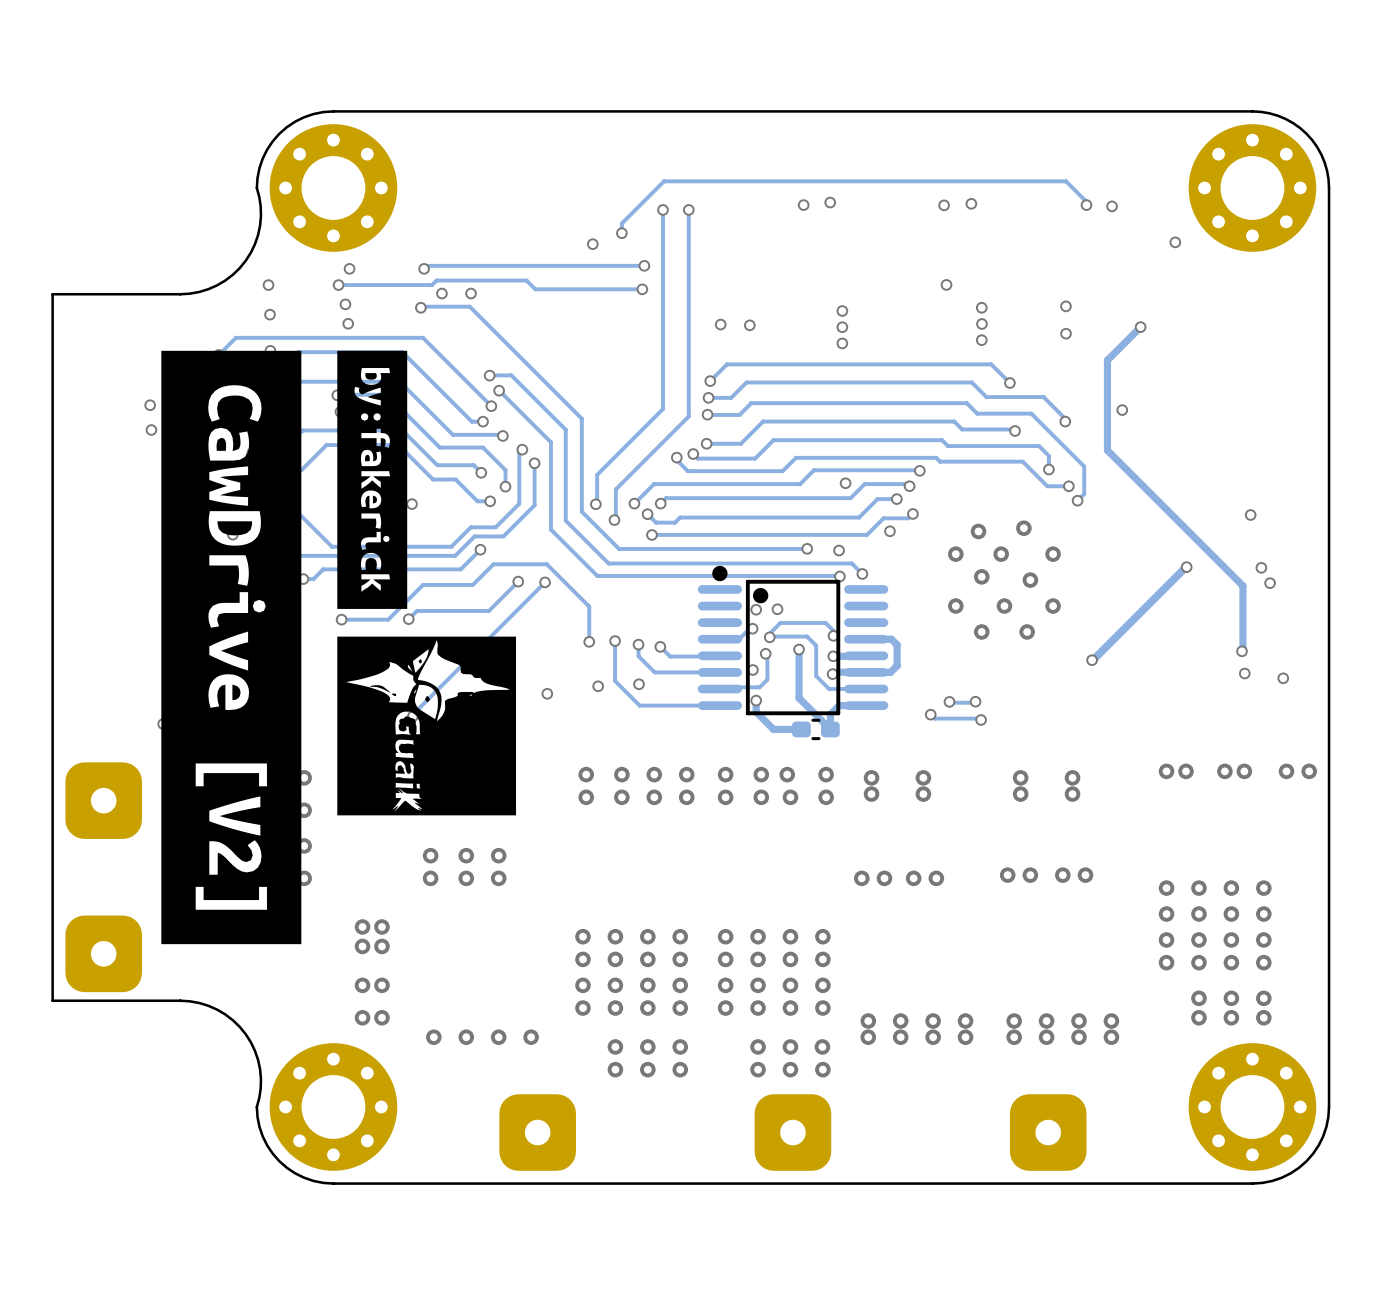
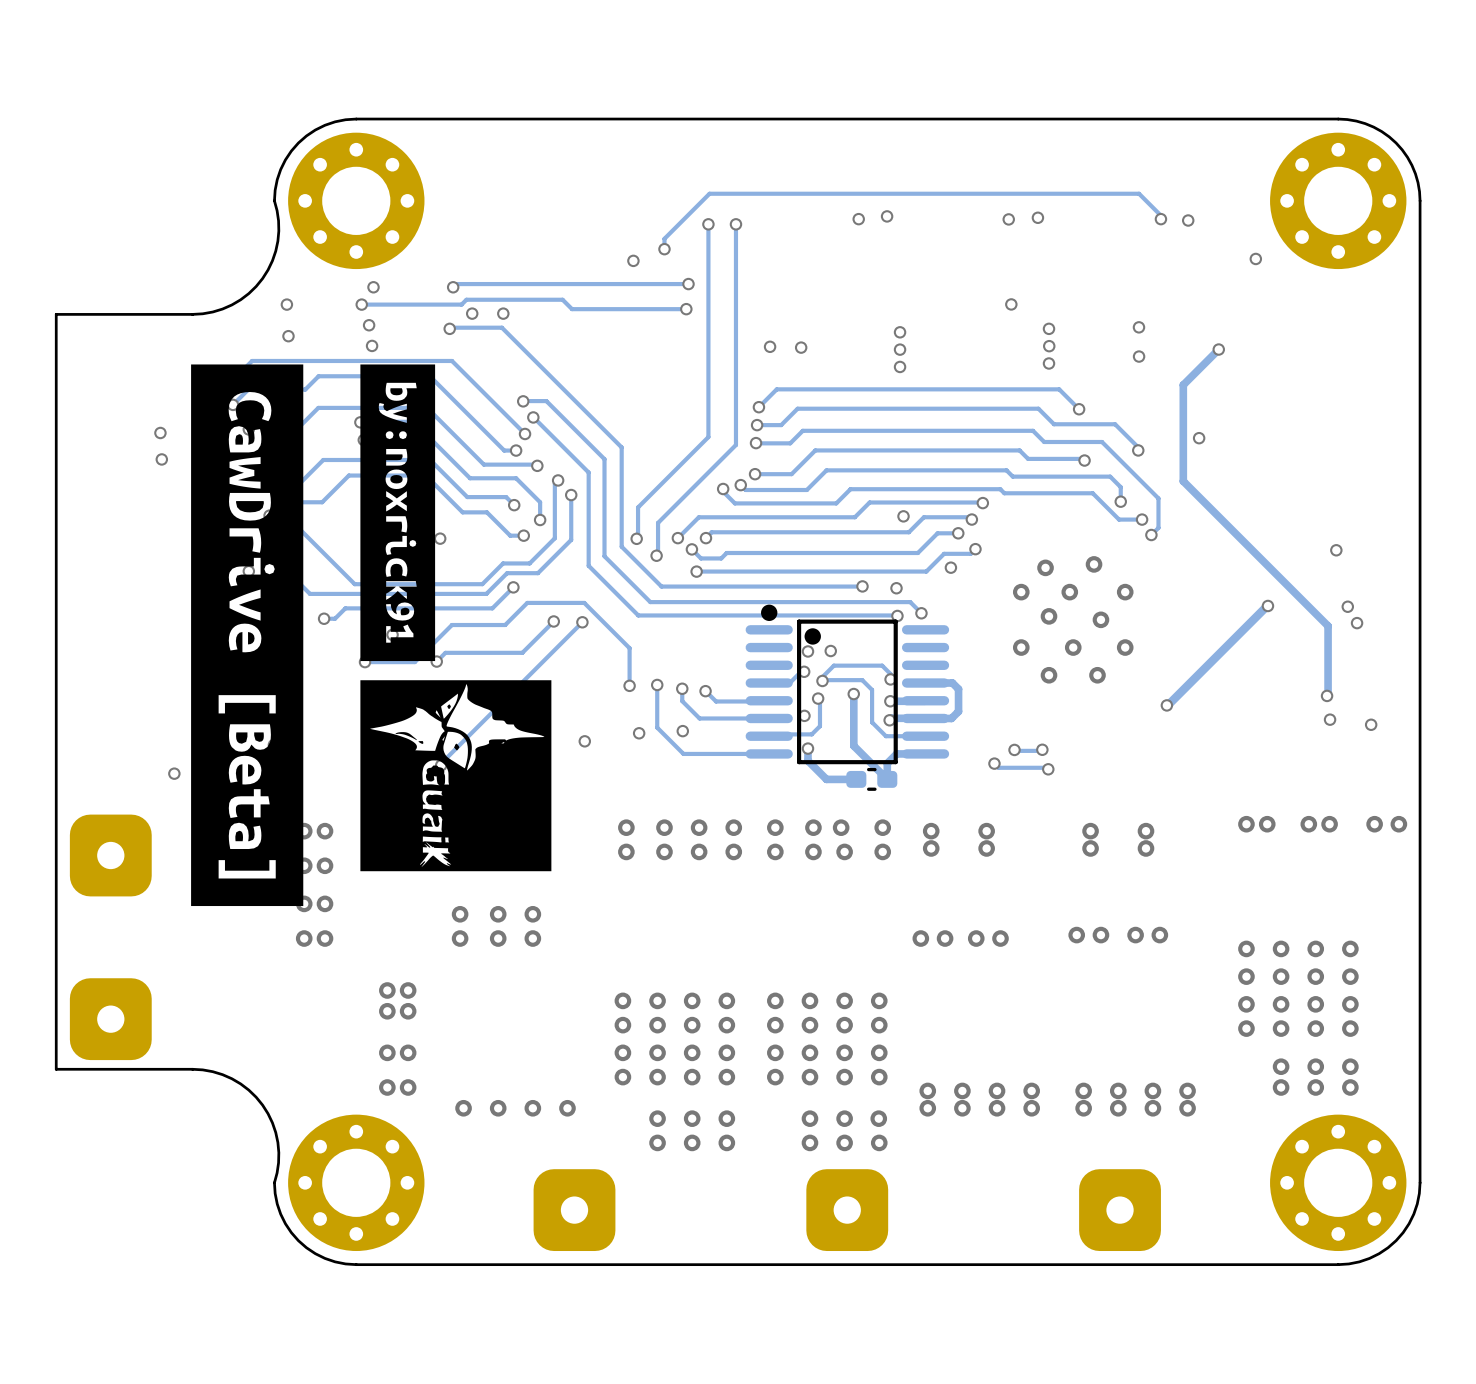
drawing: none -> [191, 364, 304, 907]
drawing: [161, 350, 302, 945] -> none
drawing shape: [337, 350, 408, 609] -> [360, 364, 436, 662]

